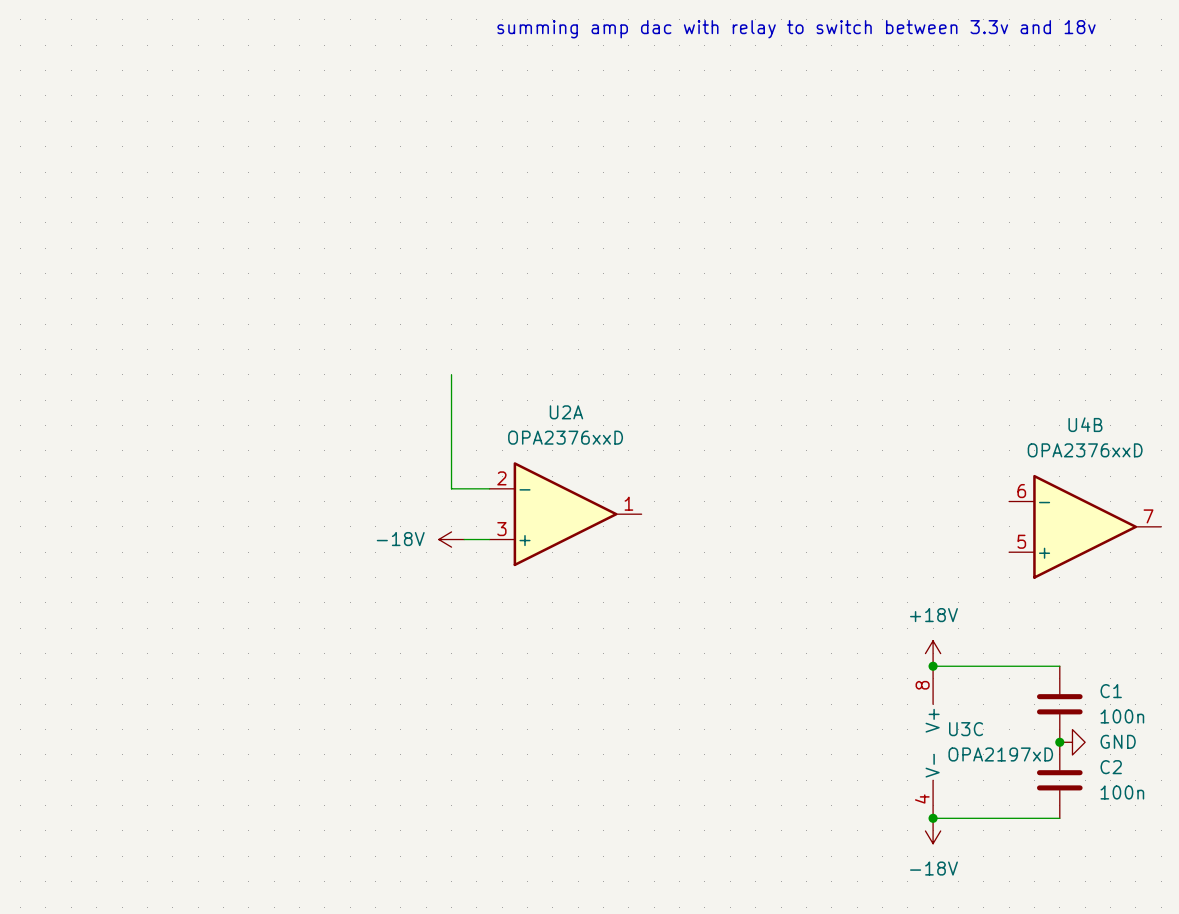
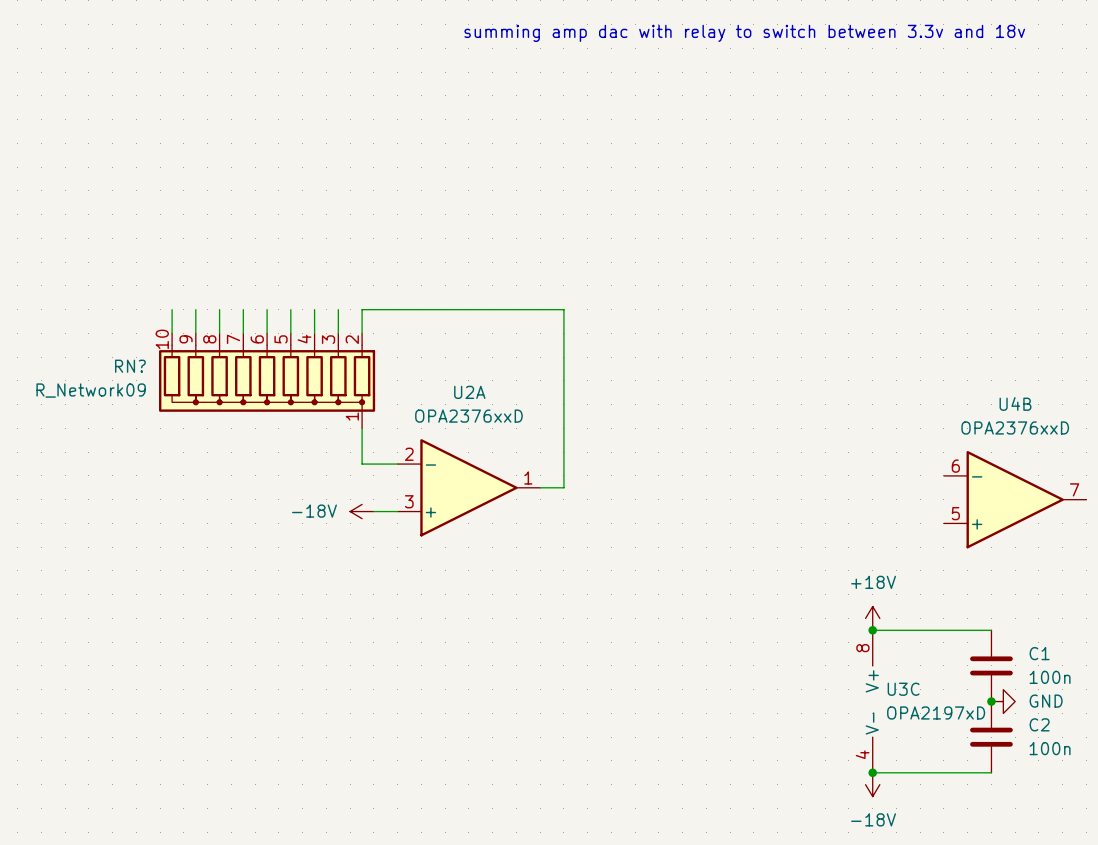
wire: none -> (172, 309) (172, 333)
wire: none -> (195, 309) (195, 333)
wire: none -> (219, 309) (219, 333)
wire: none -> (243, 309) (243, 333)
wire: none -> (267, 309) (267, 333)
wire: none -> (290, 309) (290, 333)
wire: none -> (314, 309) (314, 333)
wire: none -> (338, 309) (338, 333)
wire: none -> (362, 333) (362, 309) (563, 309) (563, 487) (540, 487)
wire: (451, 374) (451, 488) (489, 488) -> none
RN?: none -> R_Network09 (267, 380)
wire: none -> (362, 428) (362, 464) (397, 464)
U2A position: (565, 514) -> (468, 487)
power symbol position: -18V (451, 539) -> -18V (362, 511)

